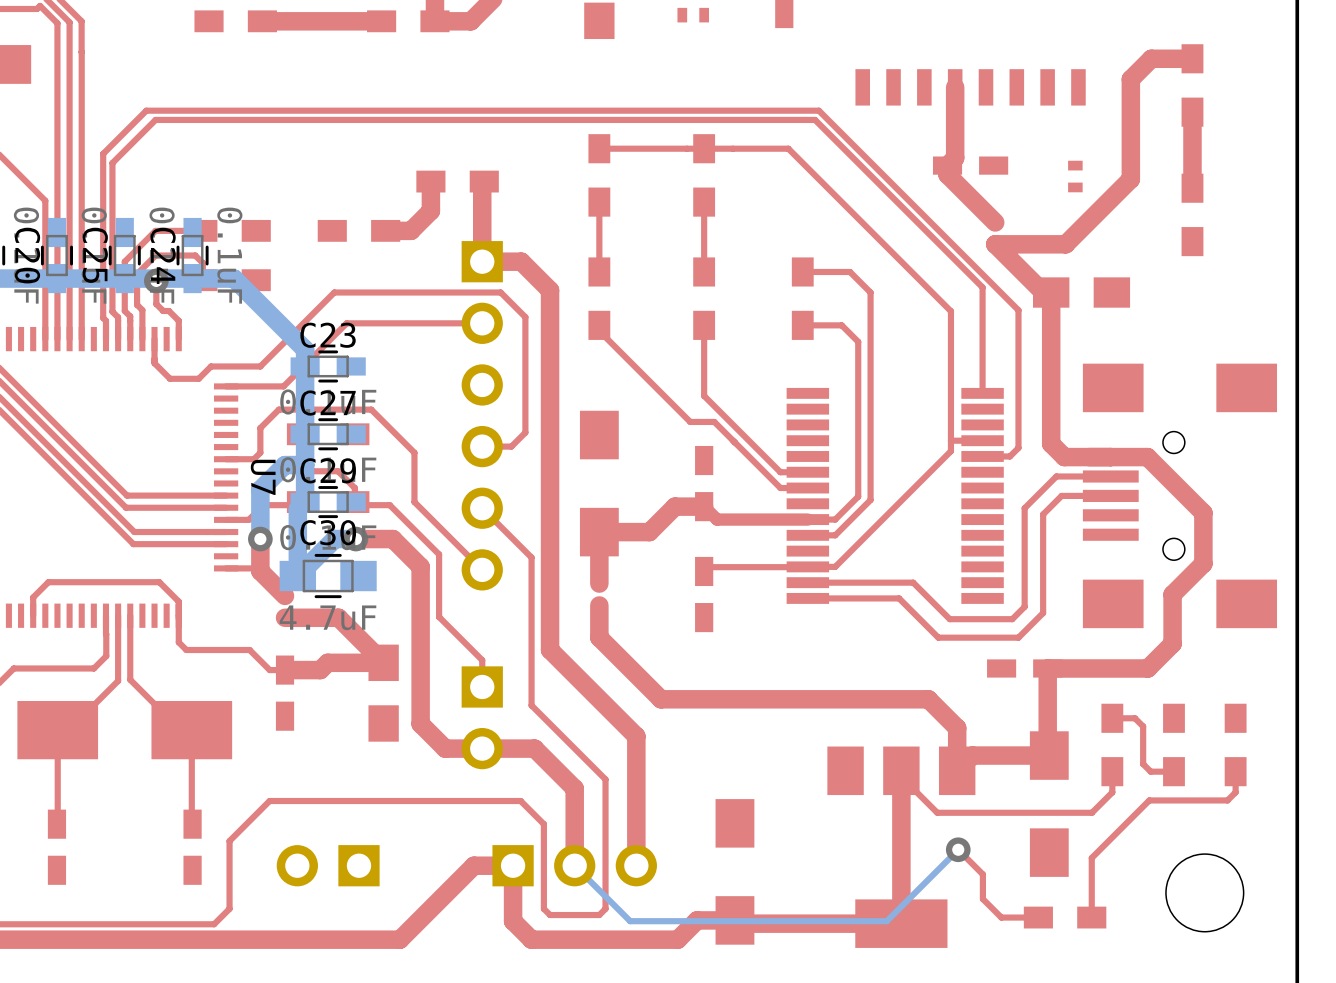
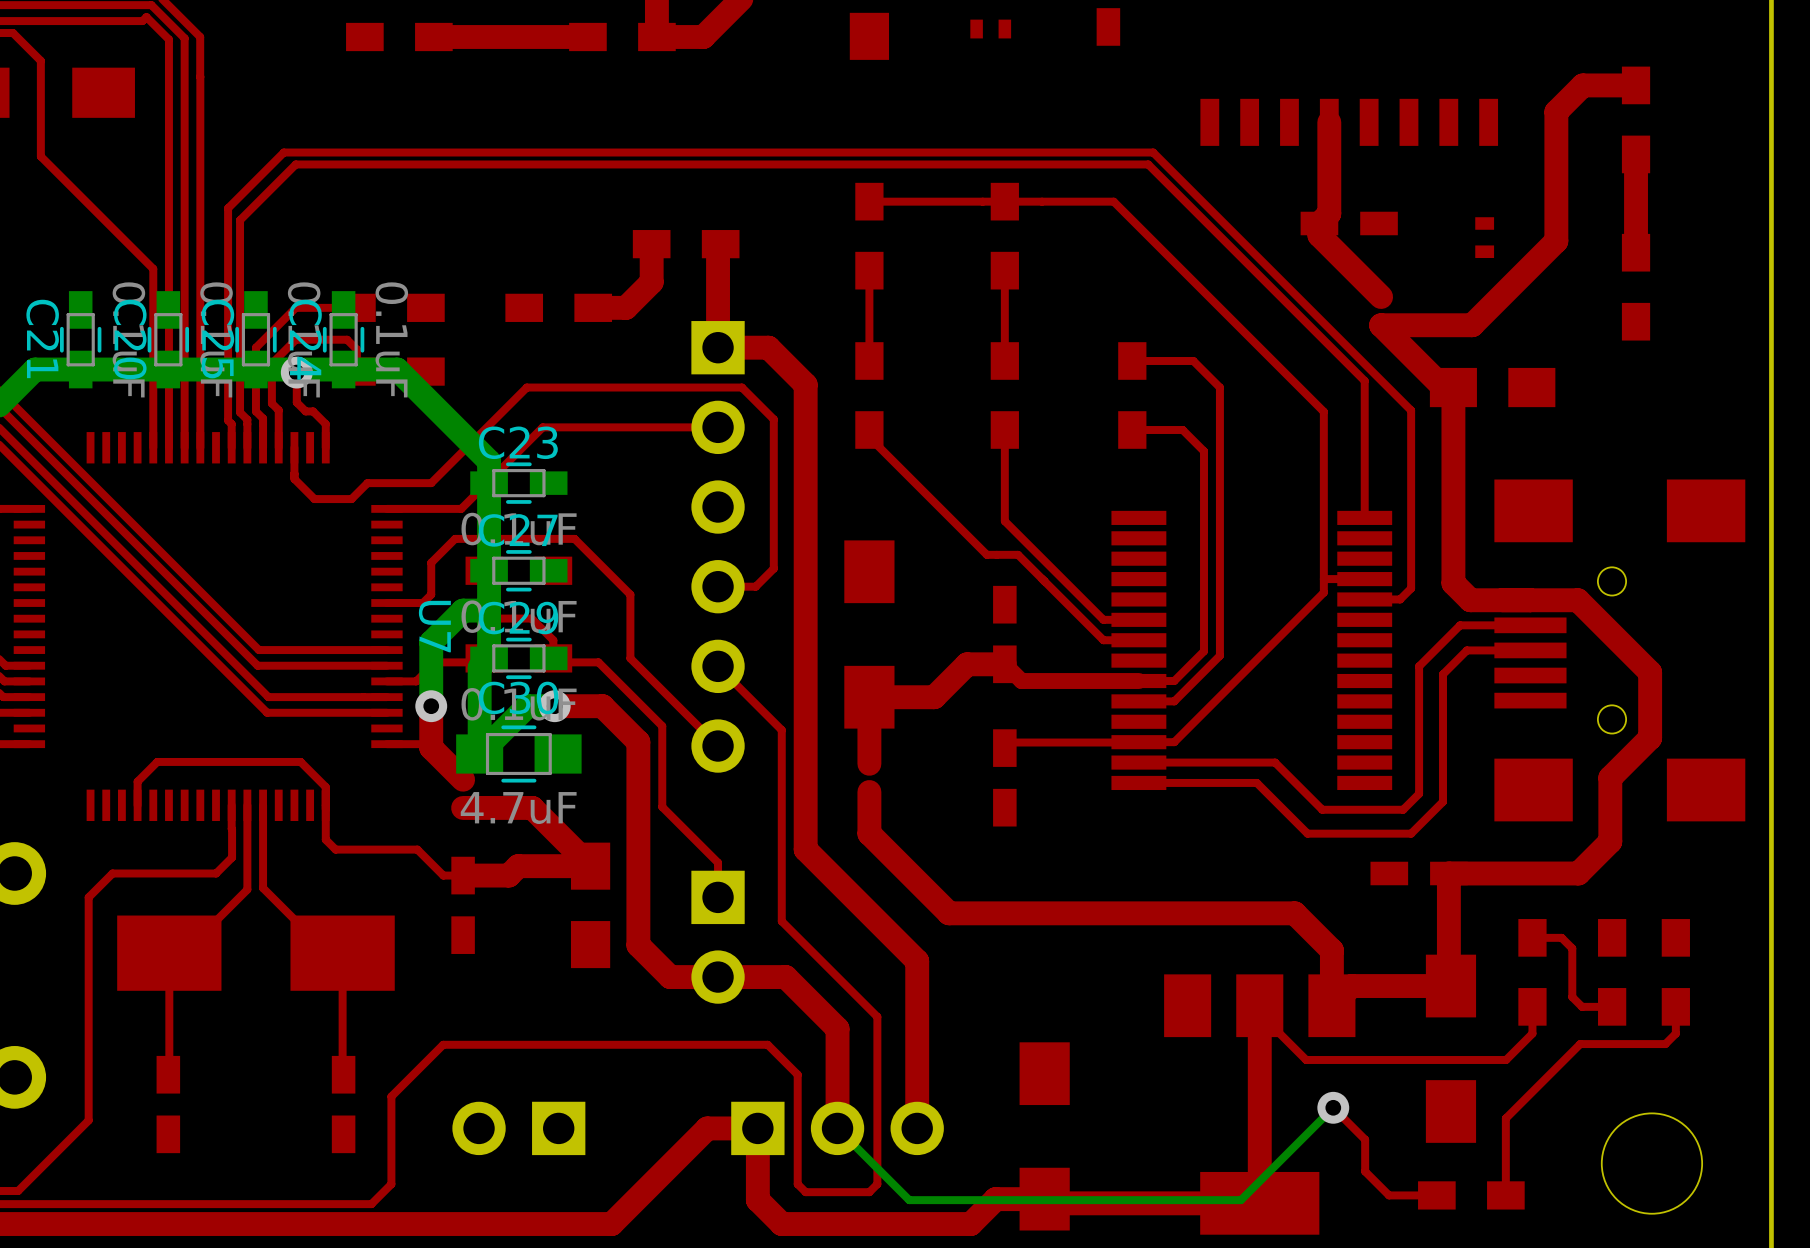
part position: (1235, 744) -> (1675, 972)
top track: (1235, 771) (1235, 792) (1227, 800) (1215, 800) -> (1675, 1006) (1675, 1033) (1665, 1044)

